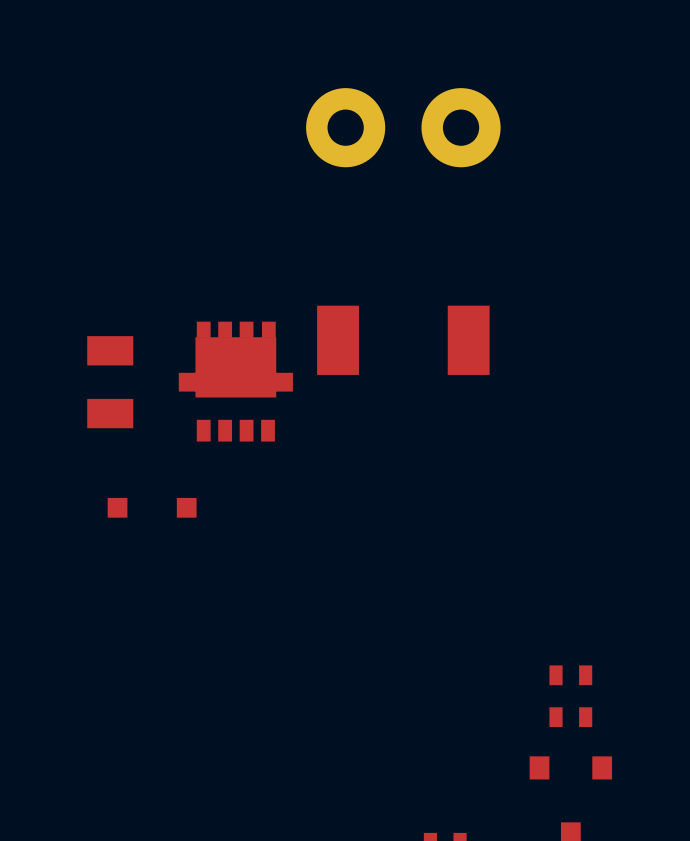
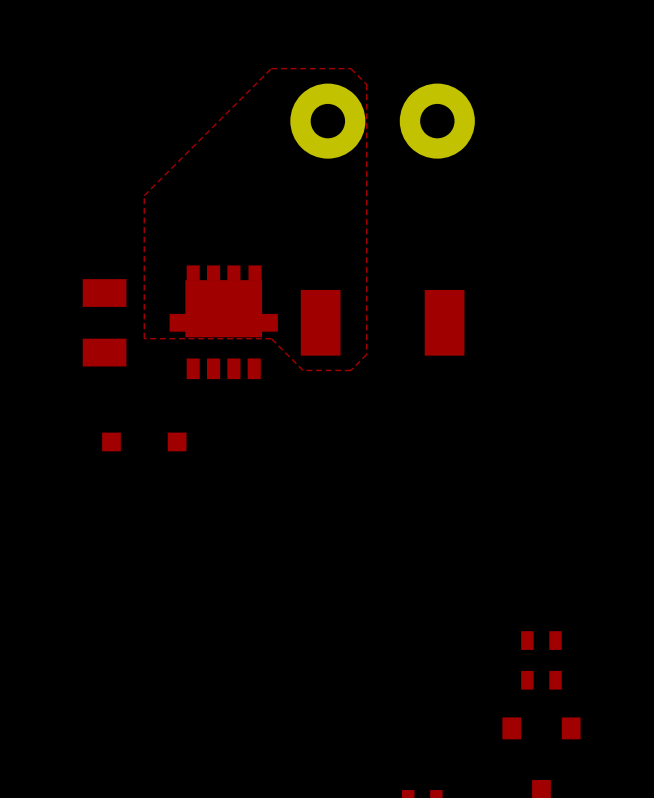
top zone outline: none -> (350, 68) (271, 68) (144, 195) (144, 338) (271, 338) (303, 370) (350, 370) (366, 354) (366, 84) (350, 68)
part position: (235, 381) -> (223, 322)
part position: (110, 382) -> (104, 322)
part position: (152, 507) -> (144, 441)

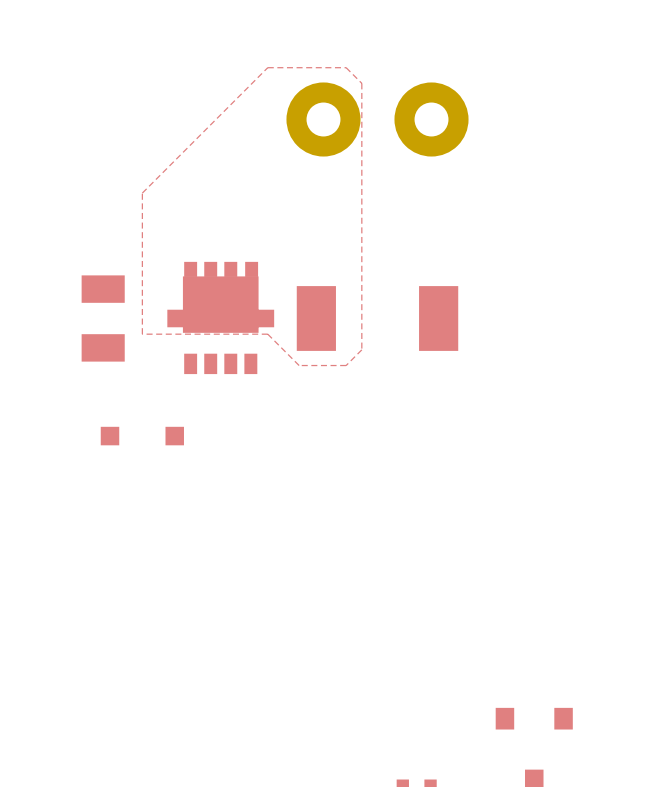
part: (541, 640) -> none
part: (541, 680) -> none

